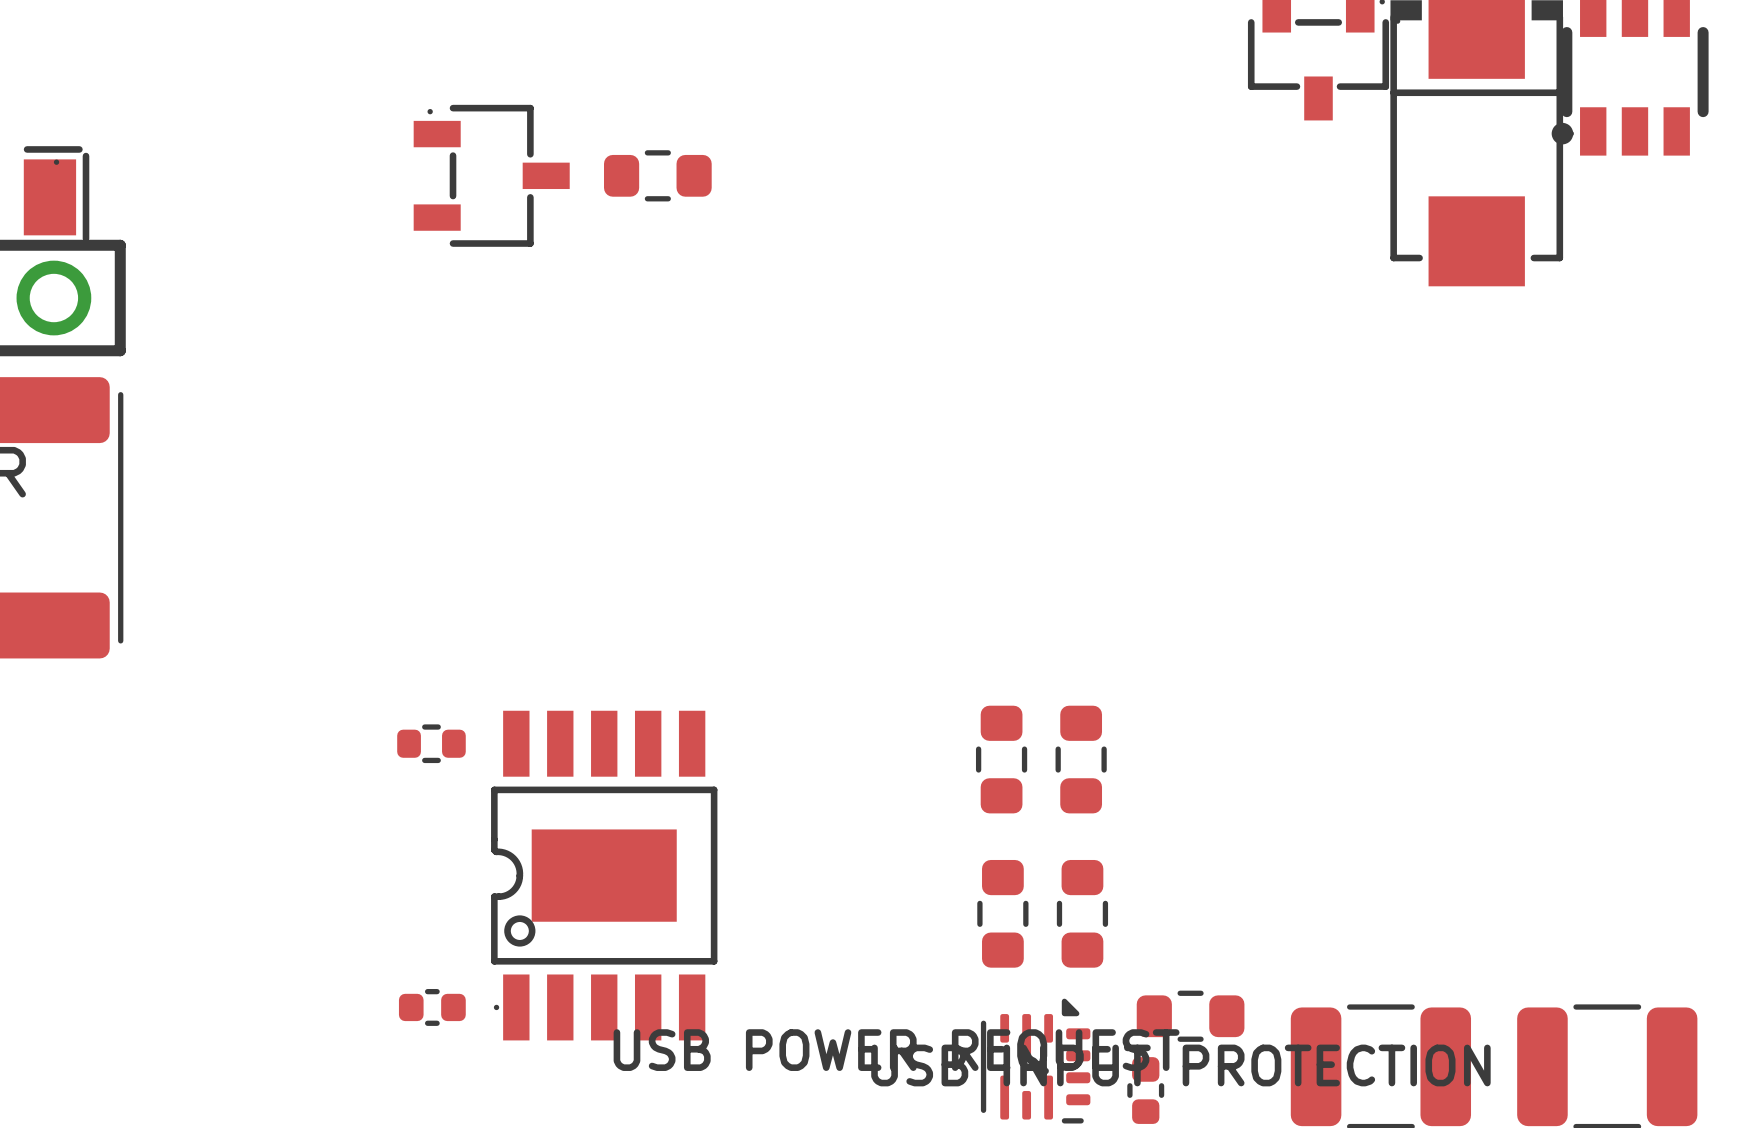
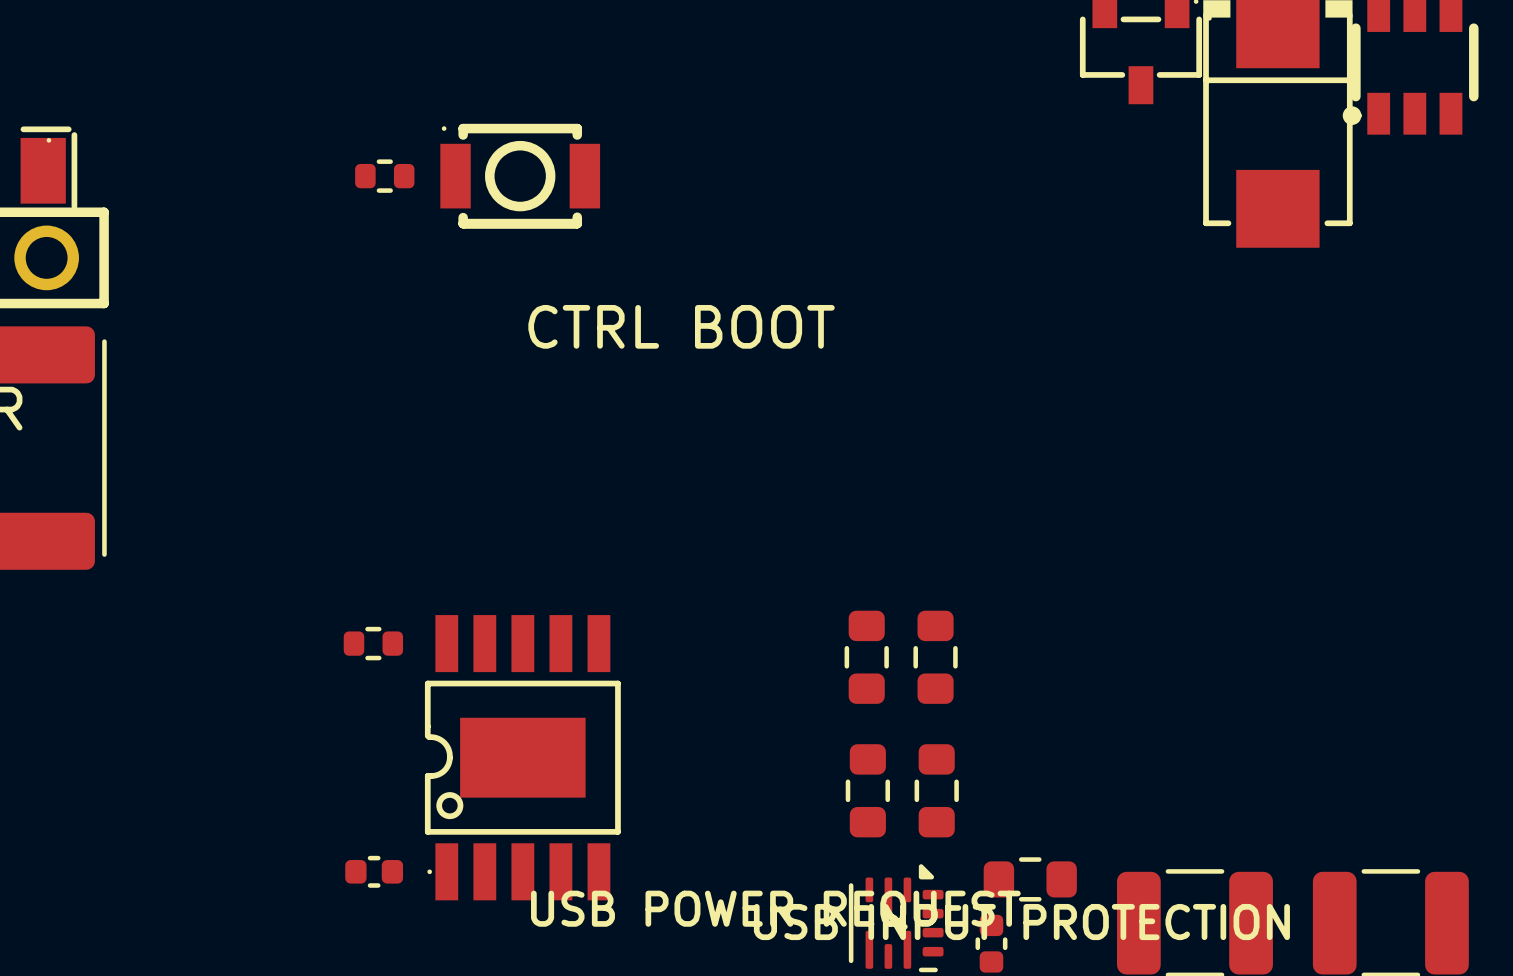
part: (491, 175) -> none
part: (657, 175) -> none
part: none -> (384, 176)
part: none -> (520, 176)

